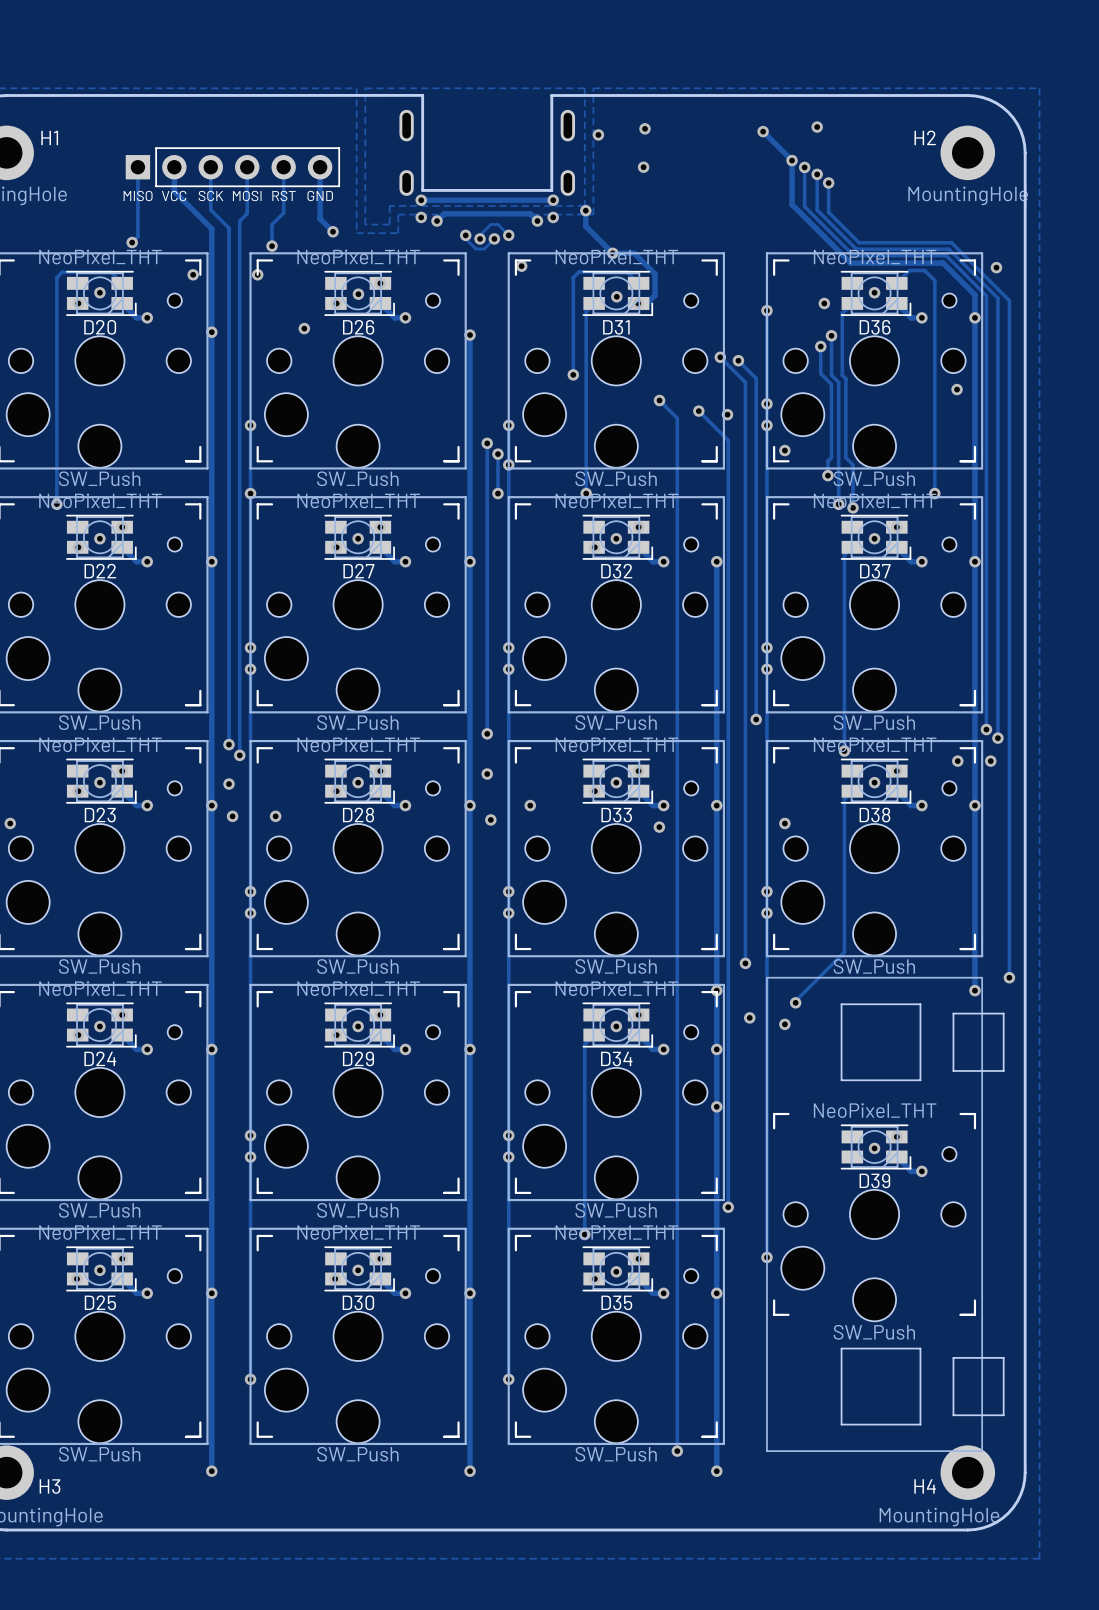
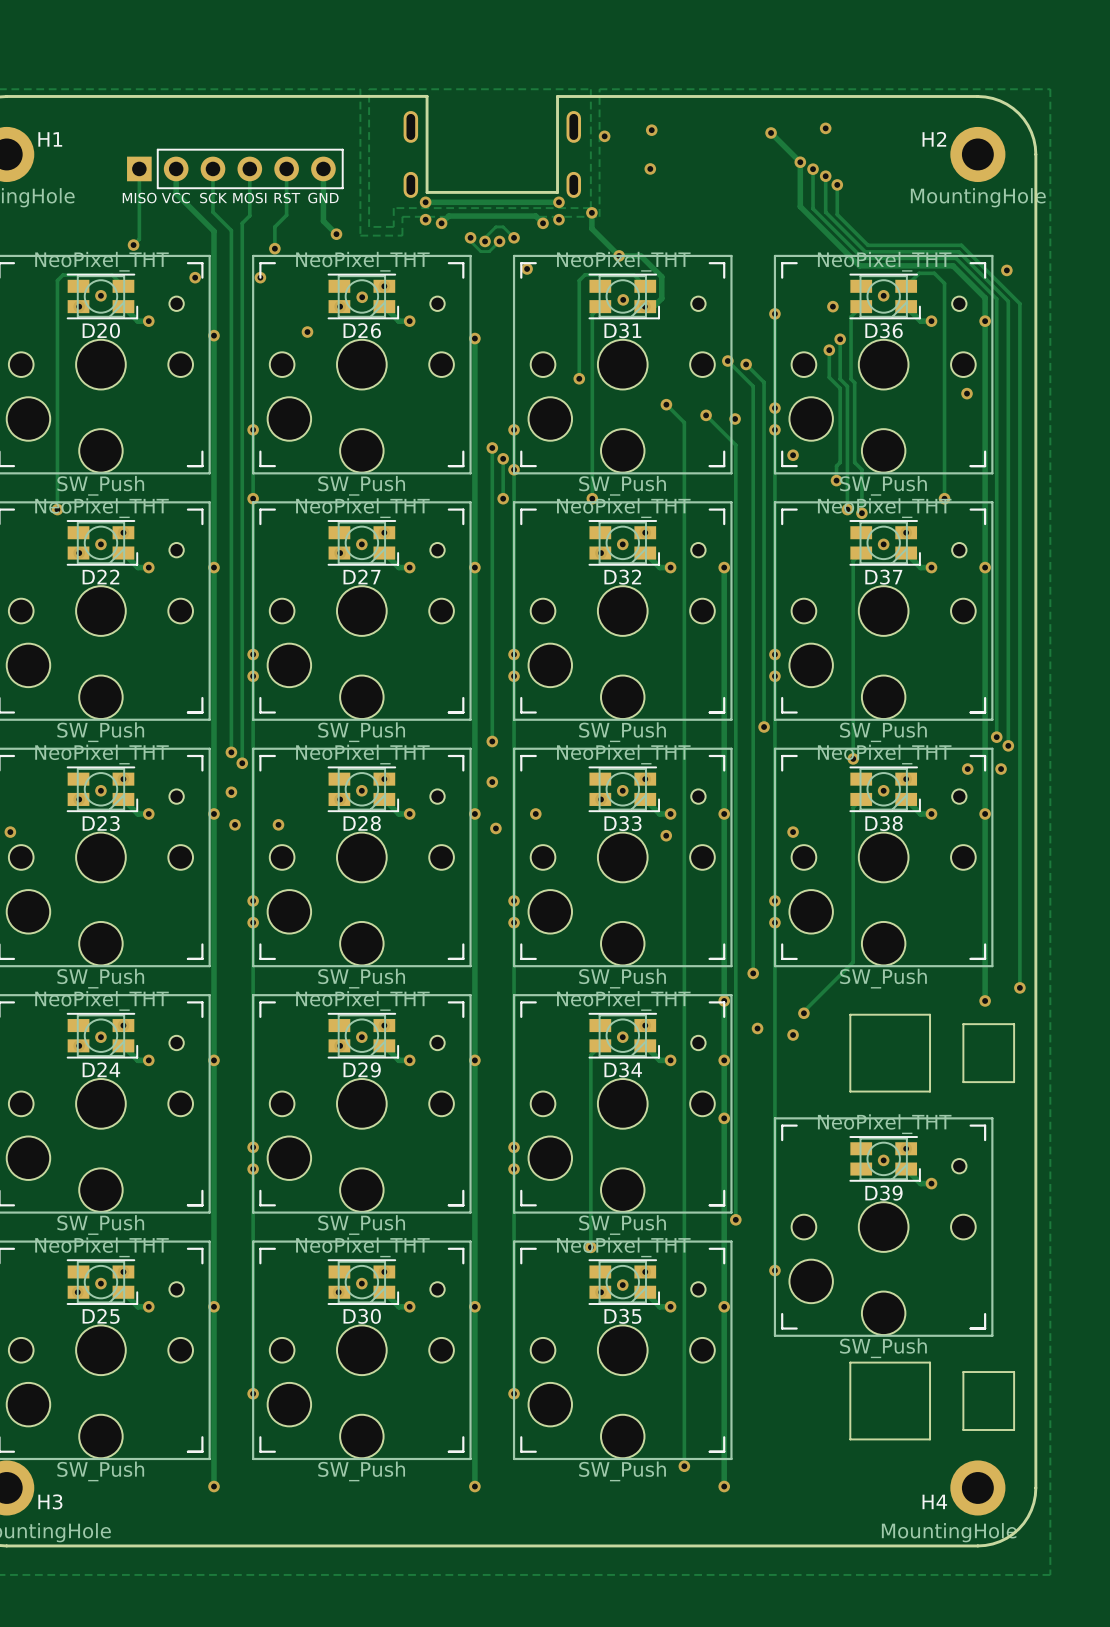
part footprint: [766, 977, 1005, 1452] -> [773, 1117, 994, 1337]
drawing: none -> [849, 1013, 1015, 1441]

